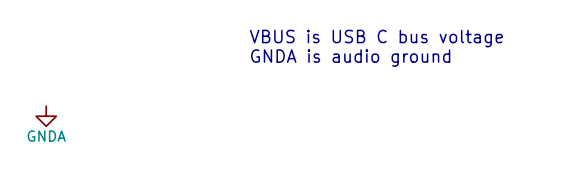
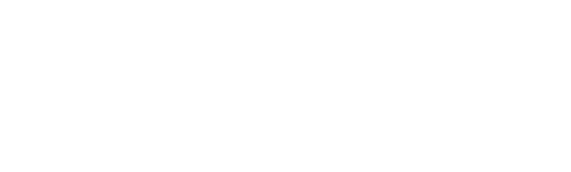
text: VBUS is USB C bus voltage (376, 38) -> none
text: GNDA is audio ground (350, 58) -> none
power symbol: GNDA (46, 116) -> none

